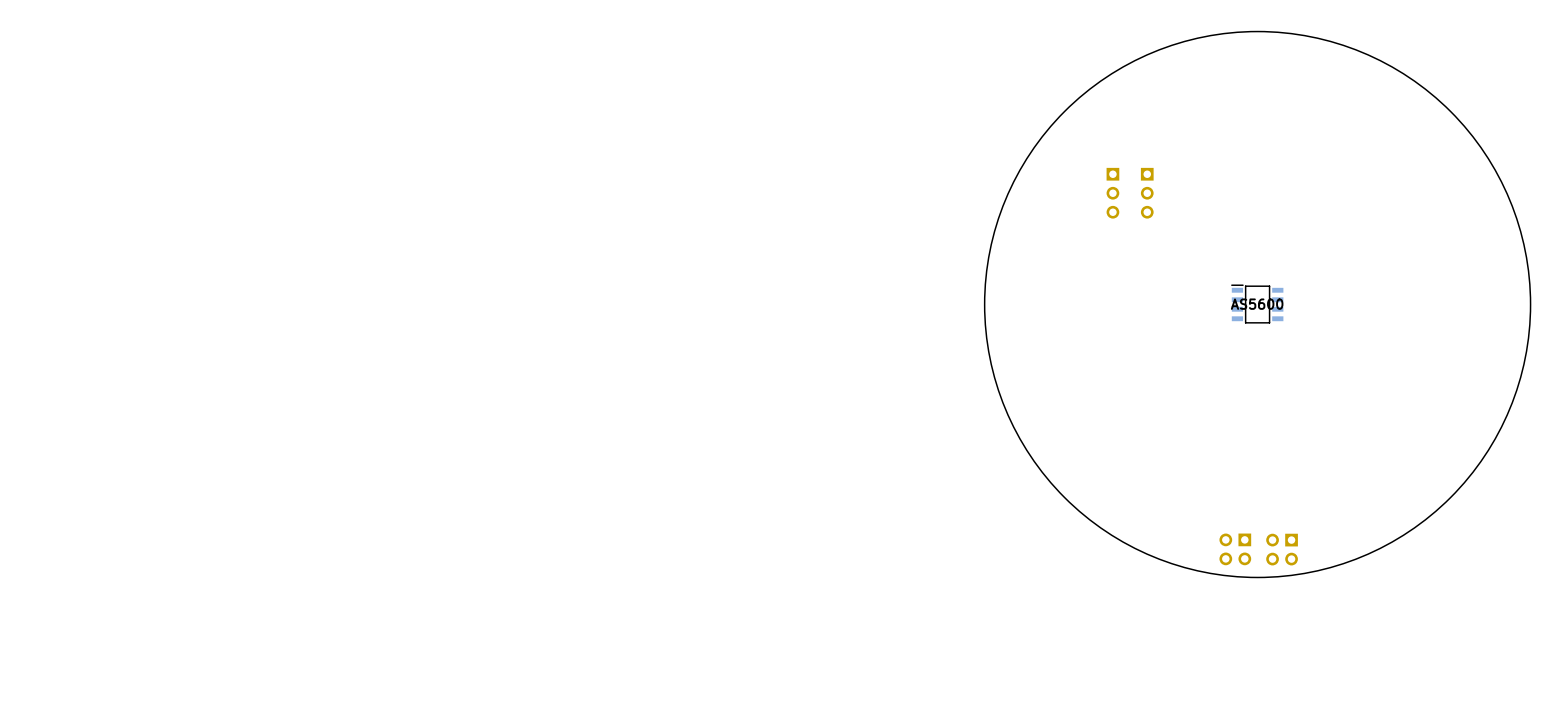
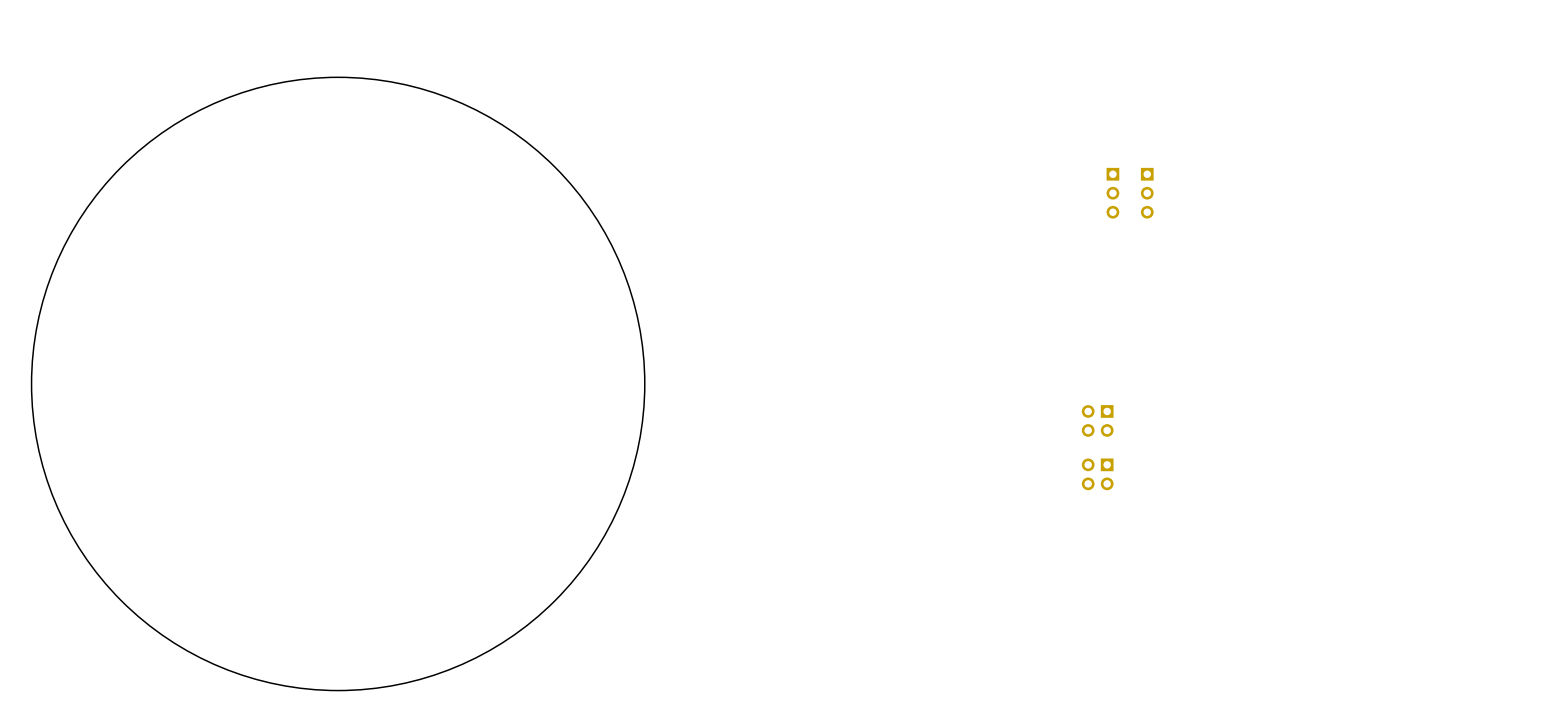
round board edge: [983, 30, 1532, 579] -> none
round board edge: none -> [30, 76, 646, 692]
AS5600: (1257, 304) -> none
part: none -> (1097, 420)
part: none -> (1097, 474)
part: (1235, 549) -> none
part: (1282, 549) -> none

